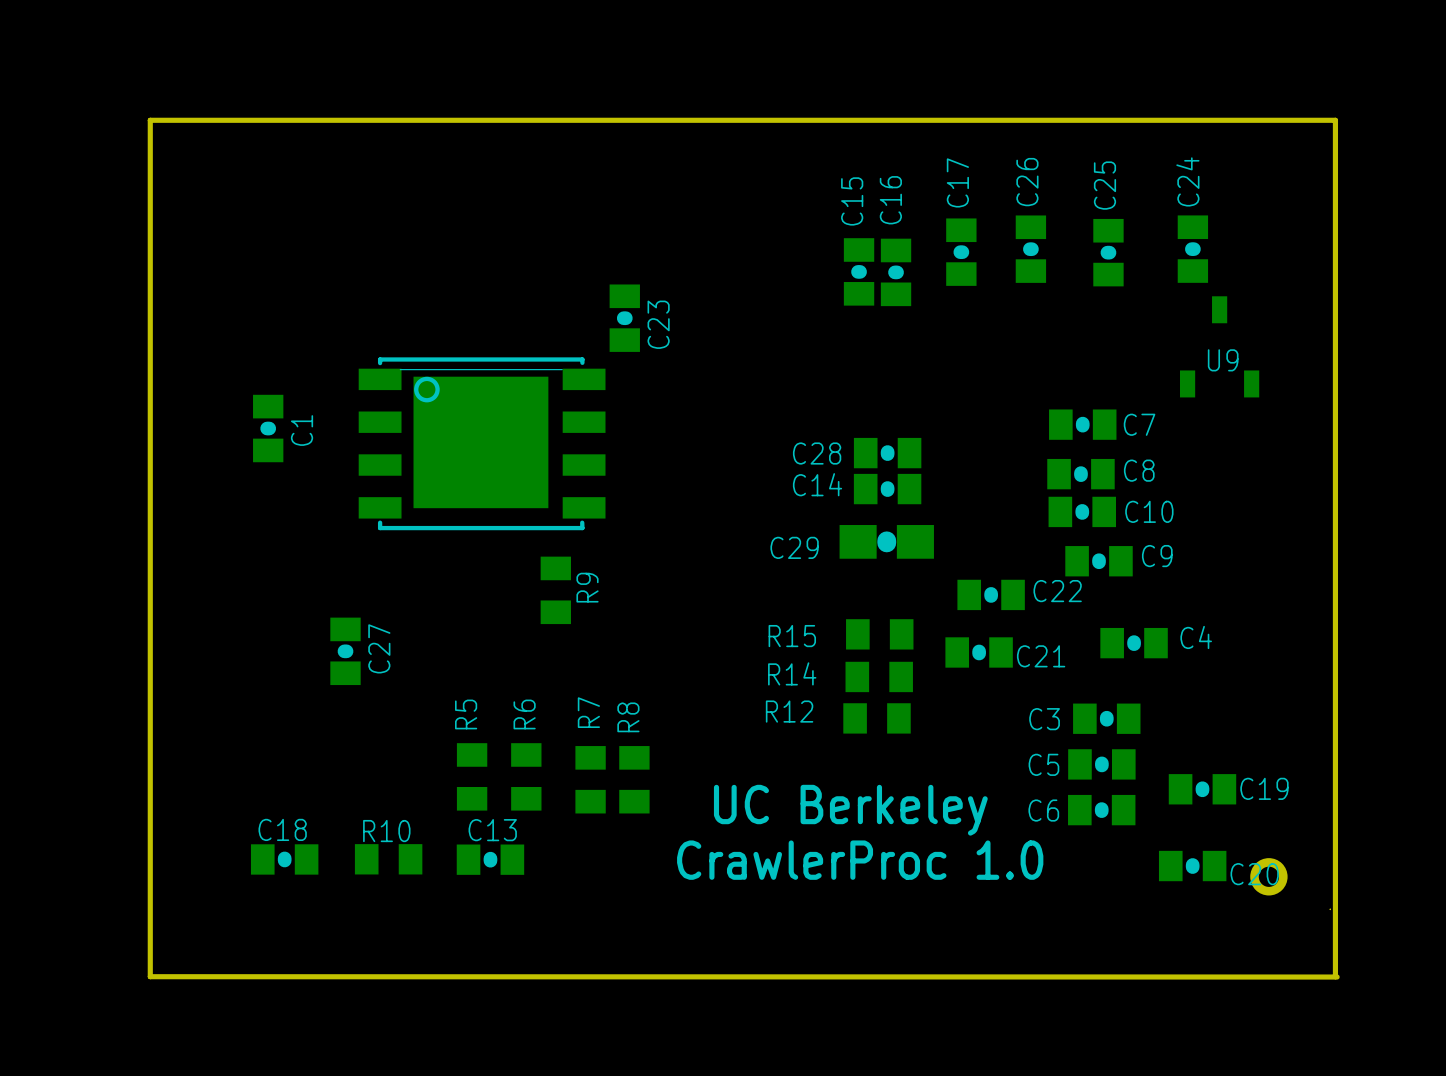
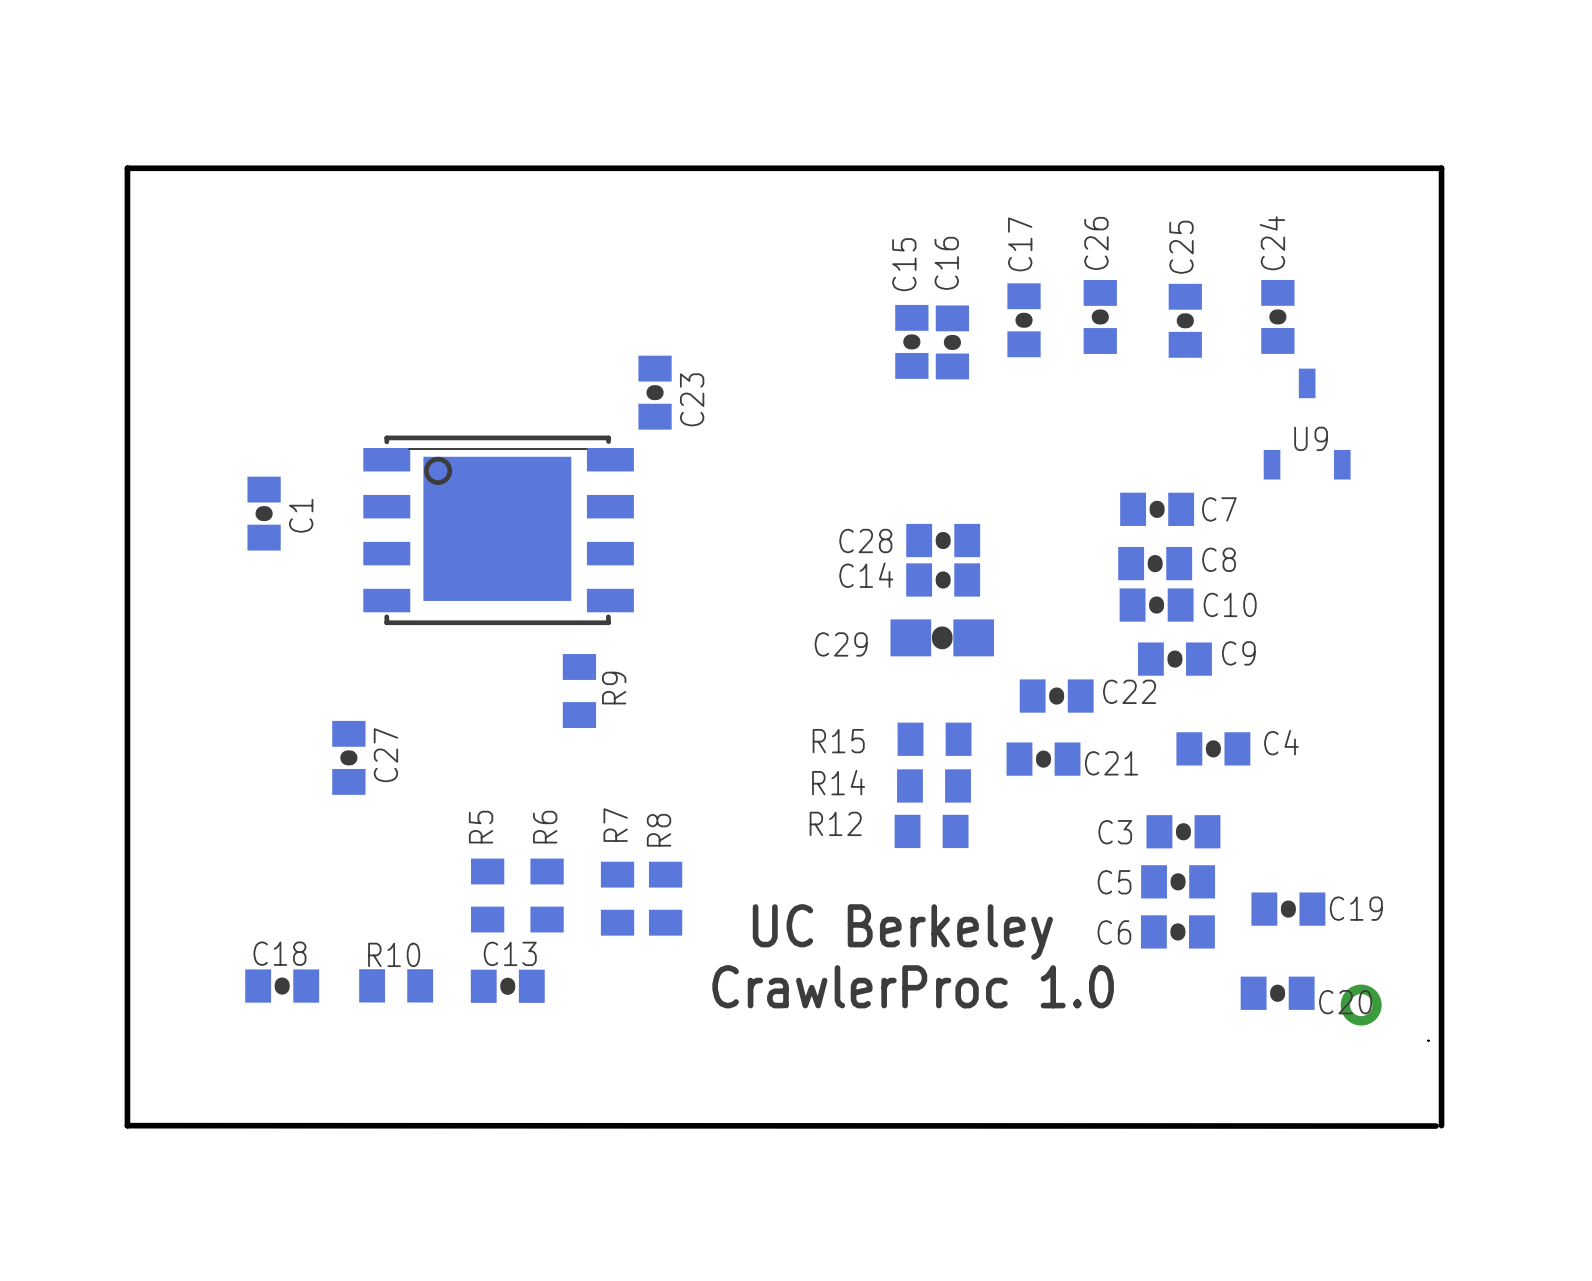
board edge: (1335, 976) (1335, 120) (150, 120) (150, 976) (1337, 977) -> none
board edge: none -> (1441, 1125) (1441, 168) (127, 168) (127, 1125) (1435, 1126)

